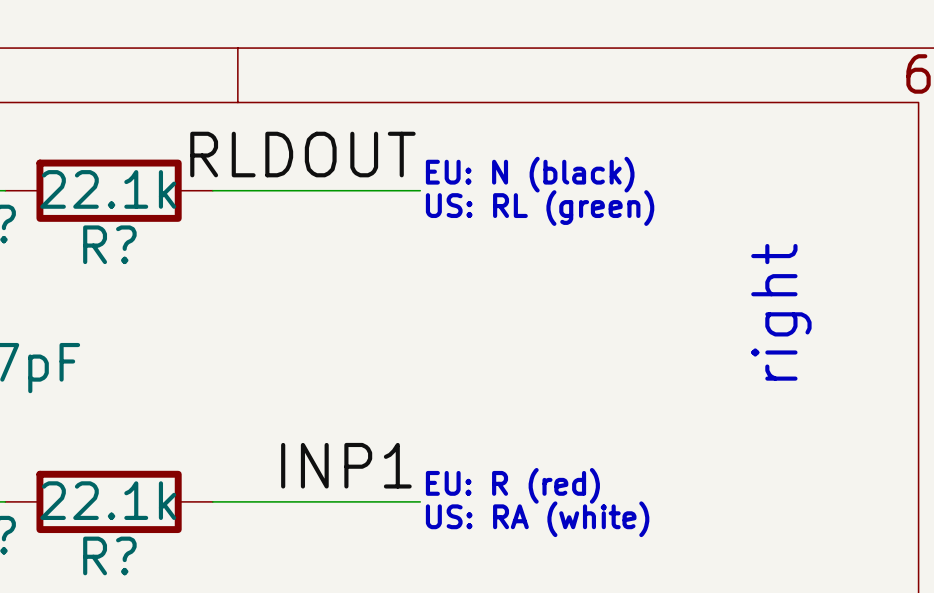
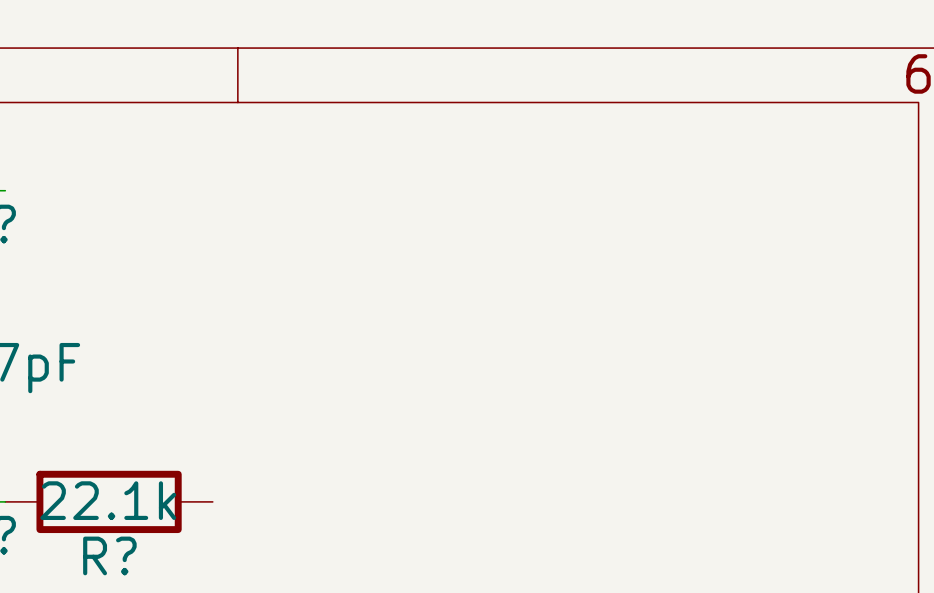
label: RLDOUT (302, 154) -> none
text: EU: N (black) (530, 174) -> none
R?: 22.1k (109, 190) -> none
wire: (212, 190) (420, 190) -> none
text: US: RL (green) (540, 208) -> none
text: right (781, 312) -> none
label: INP1 (346, 465) -> none
text: EU: R (red) (512, 485) -> none
wire: (212, 501) (420, 501) -> none
text: US: RA (white) (537, 519) -> none

